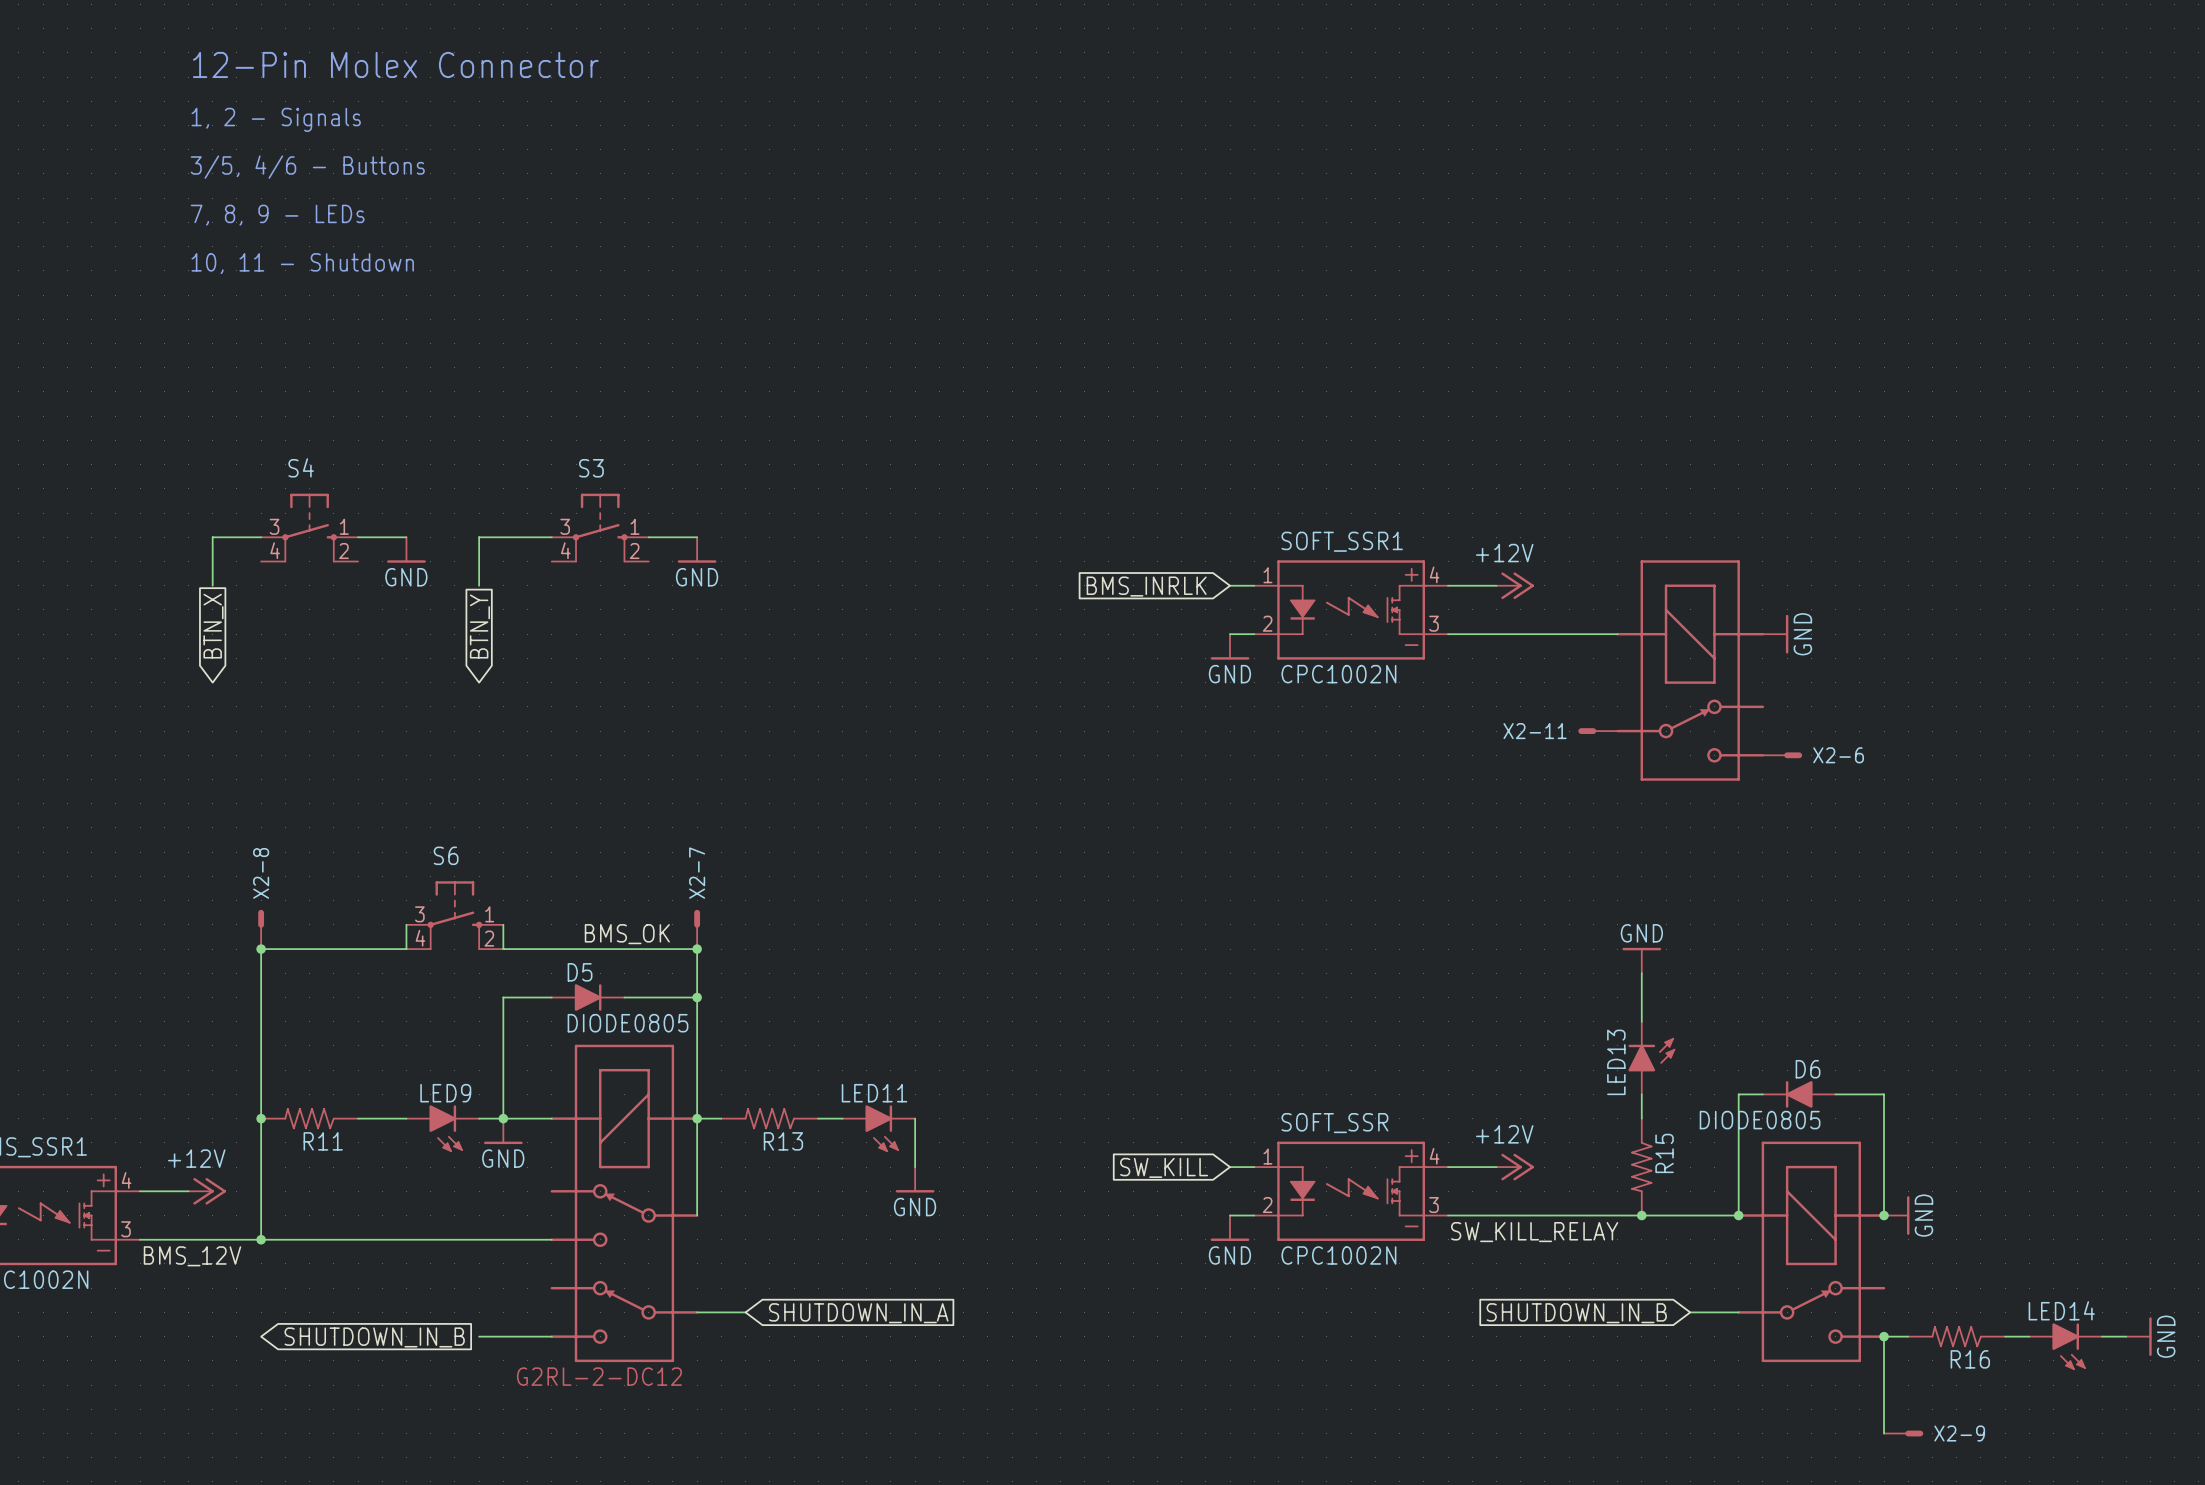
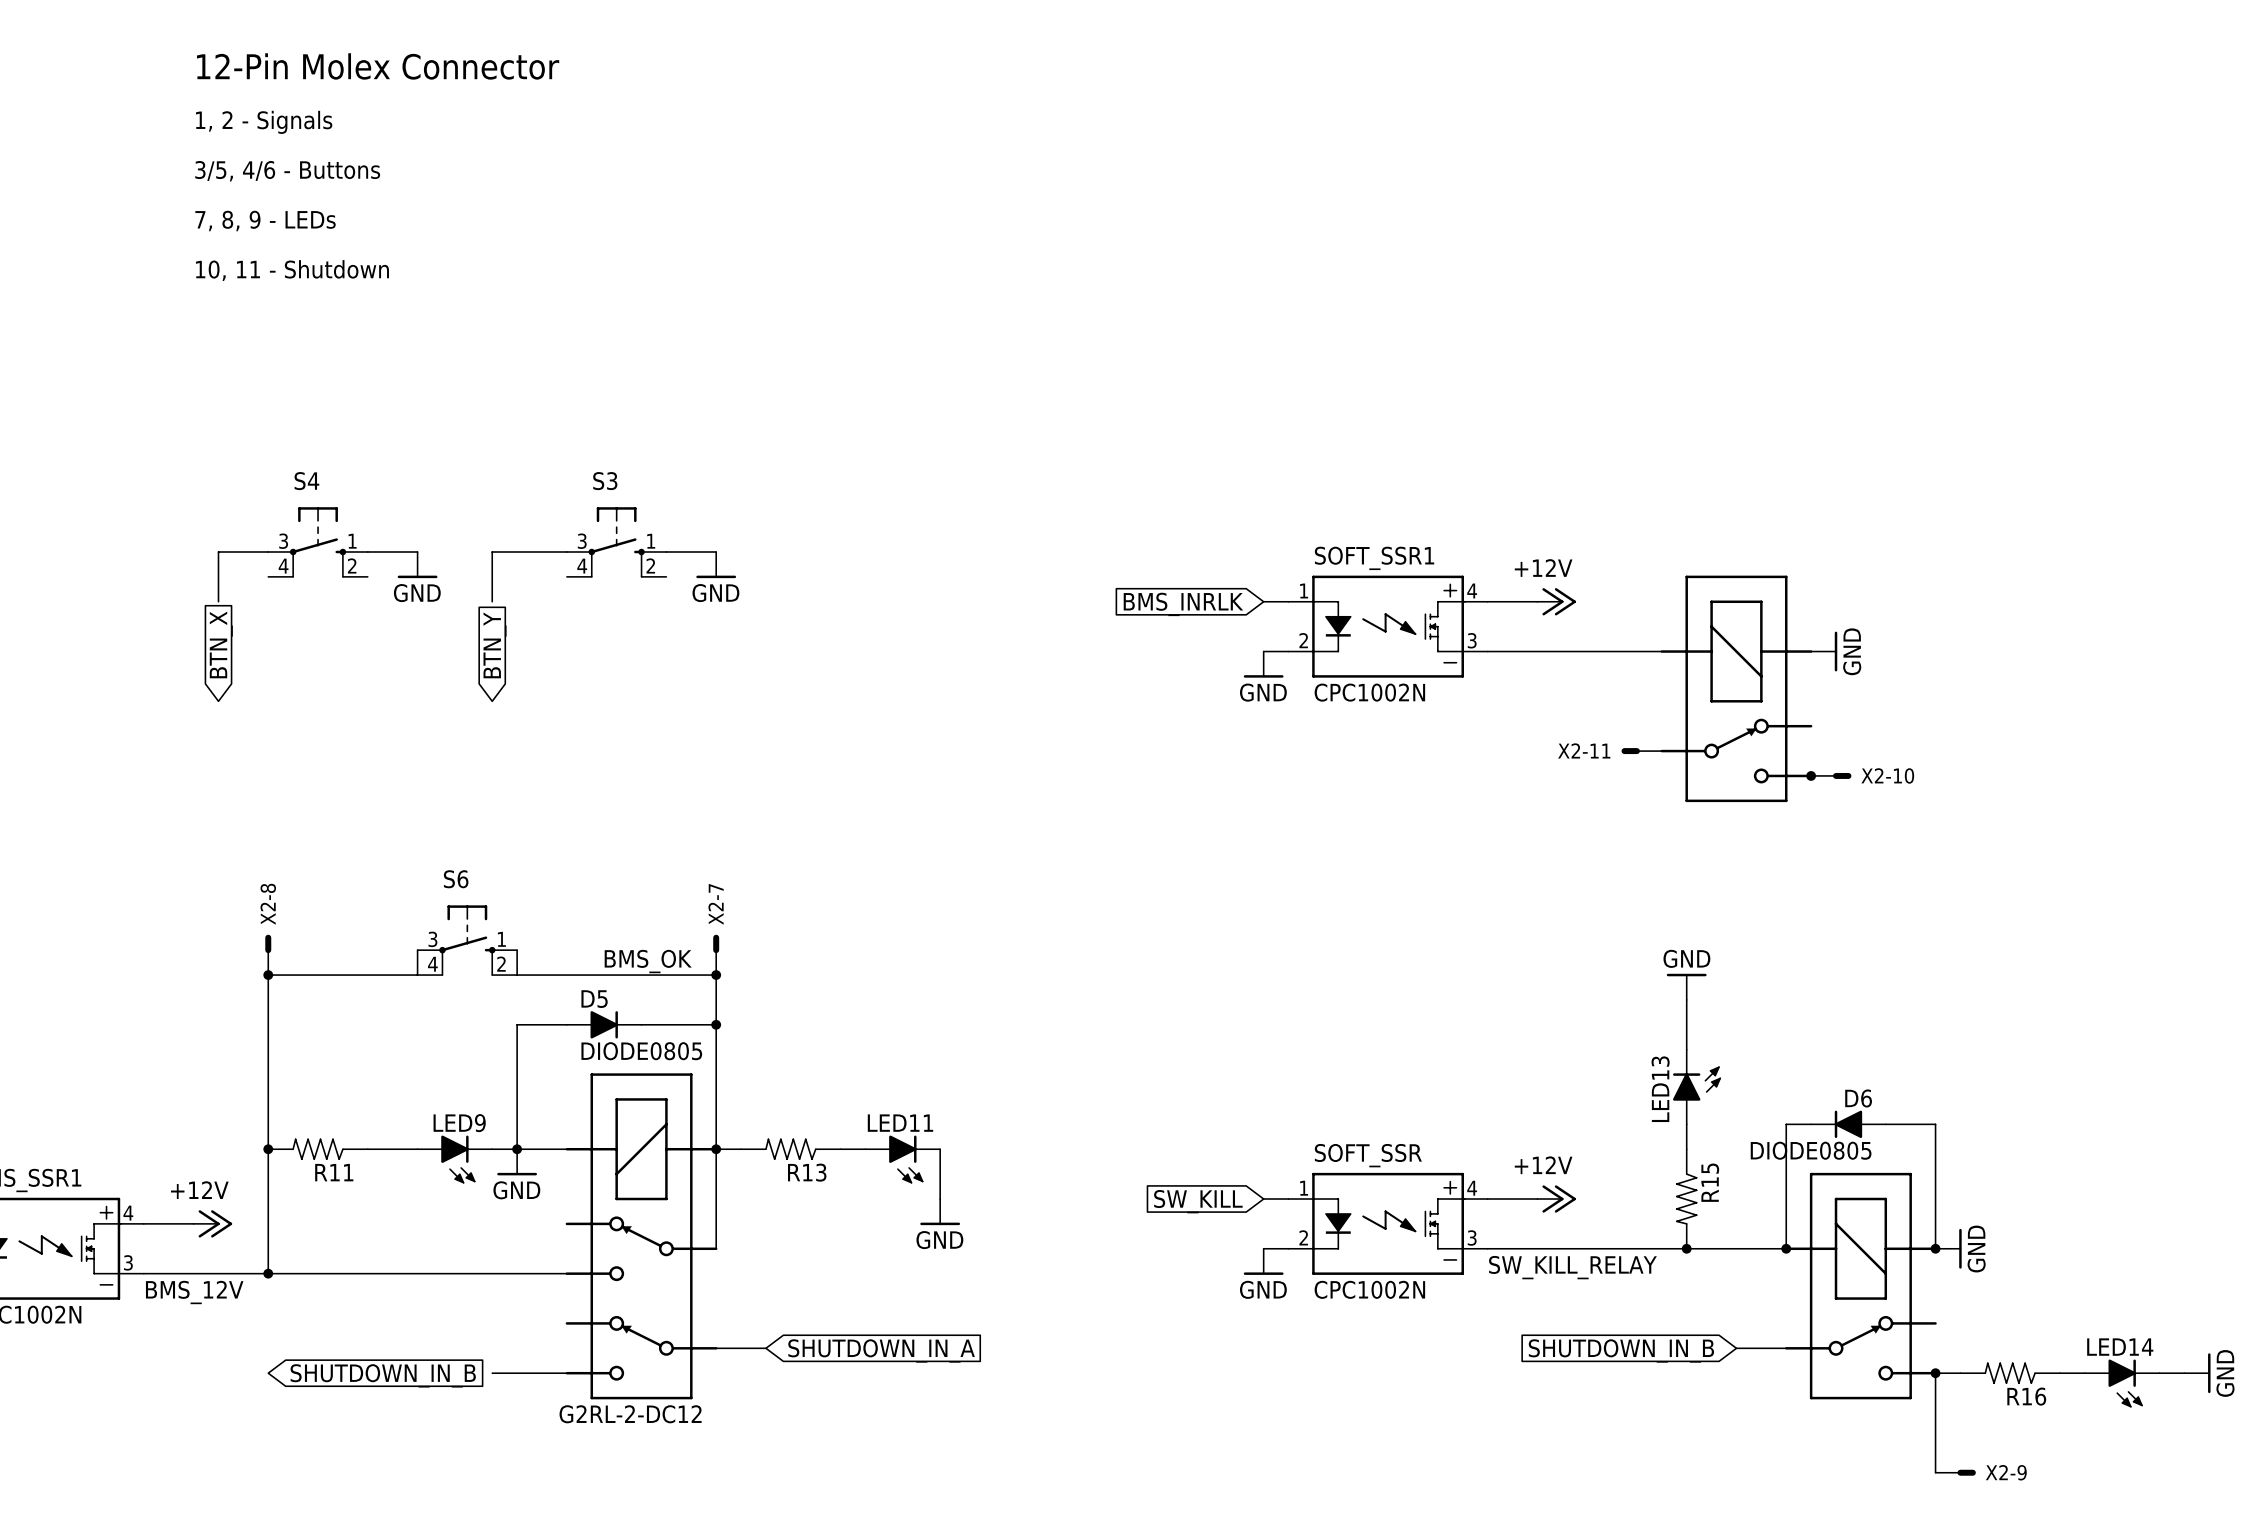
junction: none -> (1811, 775)
X2-6 name: X2-6 (1838, 755) -> X2-10 (1887, 775)

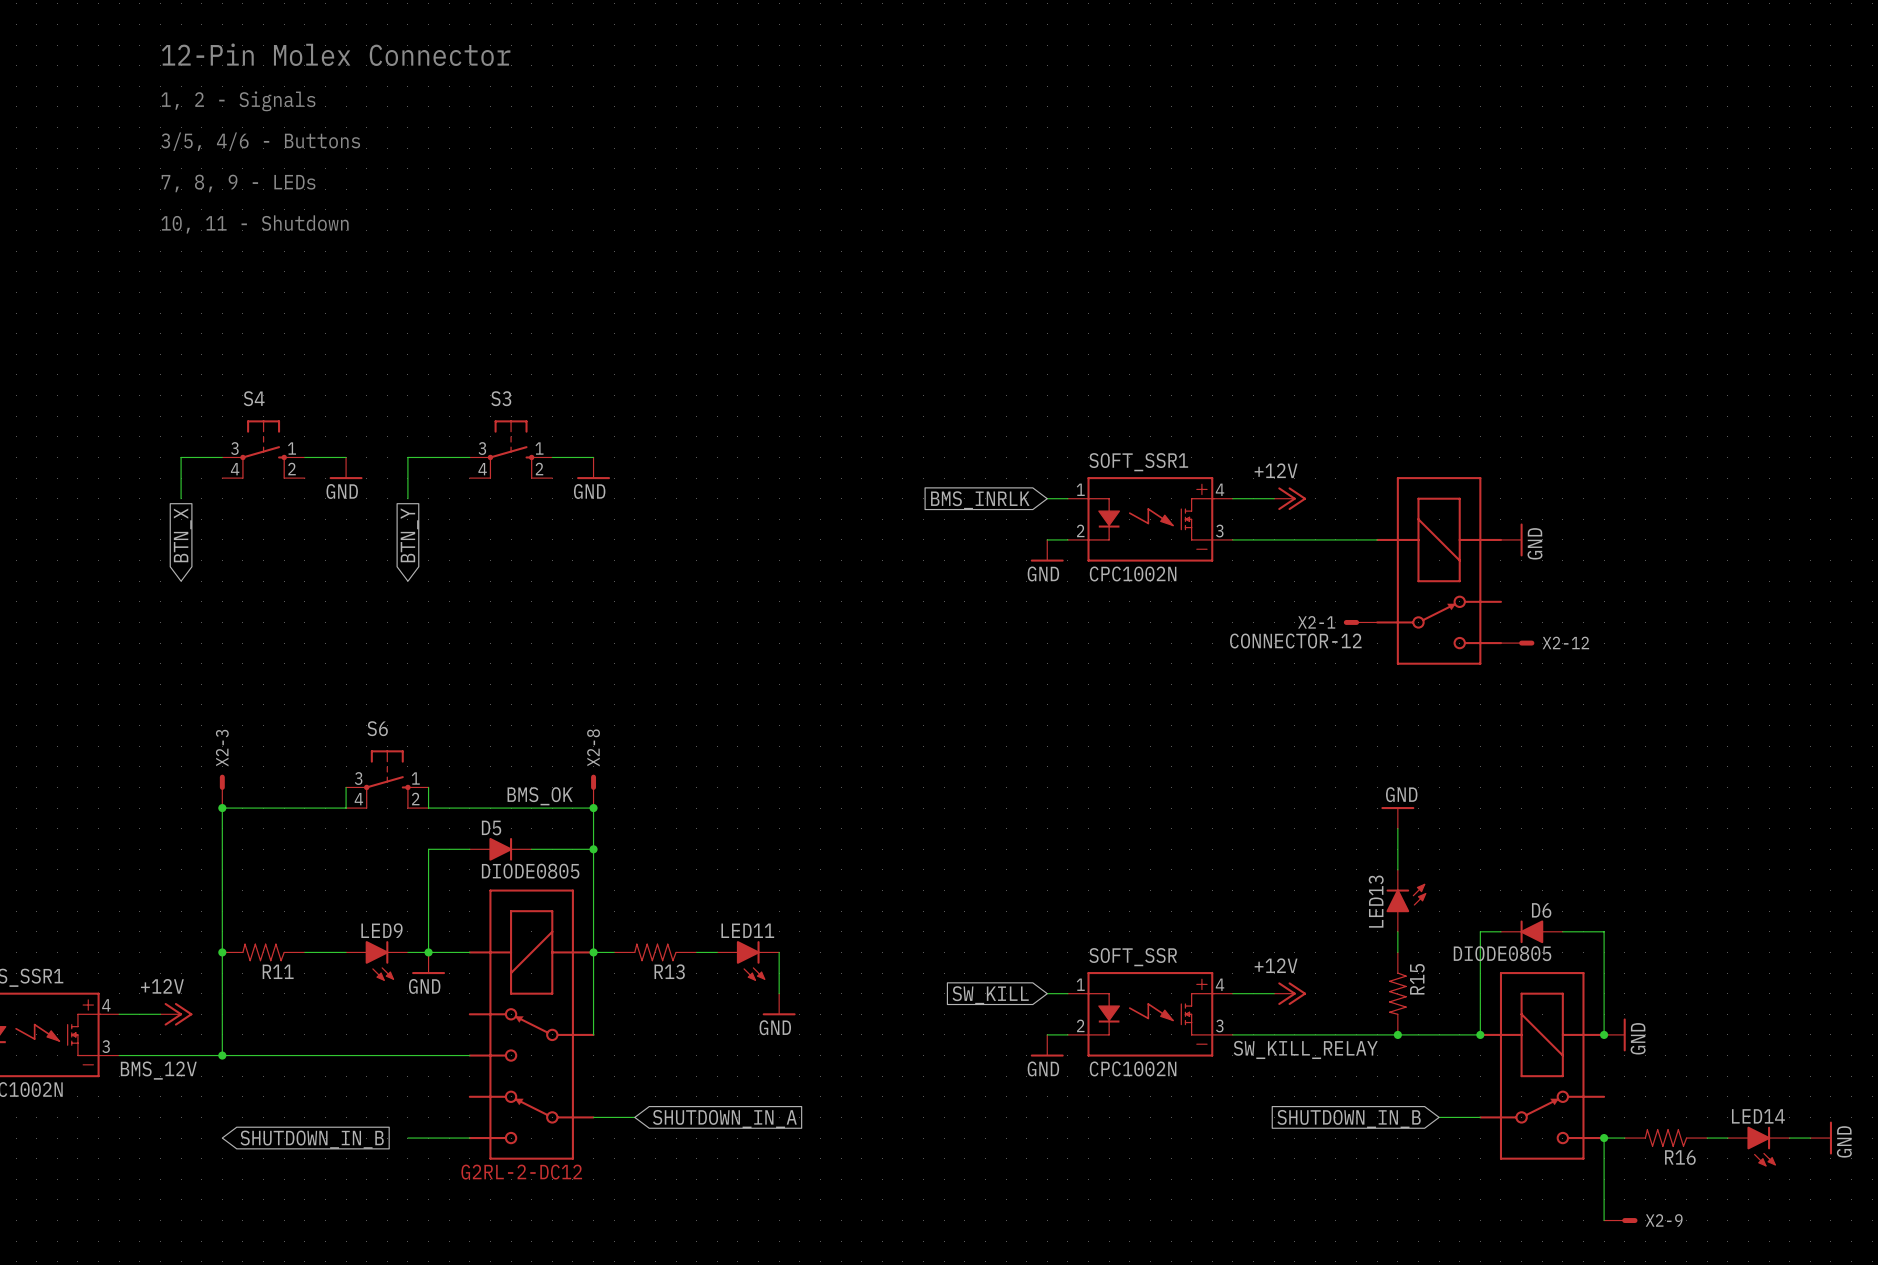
X2-11 name: X2-11 (1584, 750) -> X2-1 (1316, 622)
X2-11 value: none -> CONNECTOR-12 (1295, 641)
junction: (1811, 775) -> none
X2-10 name: X2-10 (1887, 775) -> X2-12 (1565, 642)
X2-8 name: X2-8 (268, 904) -> X2-3 (222, 748)
X2-7 name: X2-7 (716, 904) -> X2-8 (593, 747)

